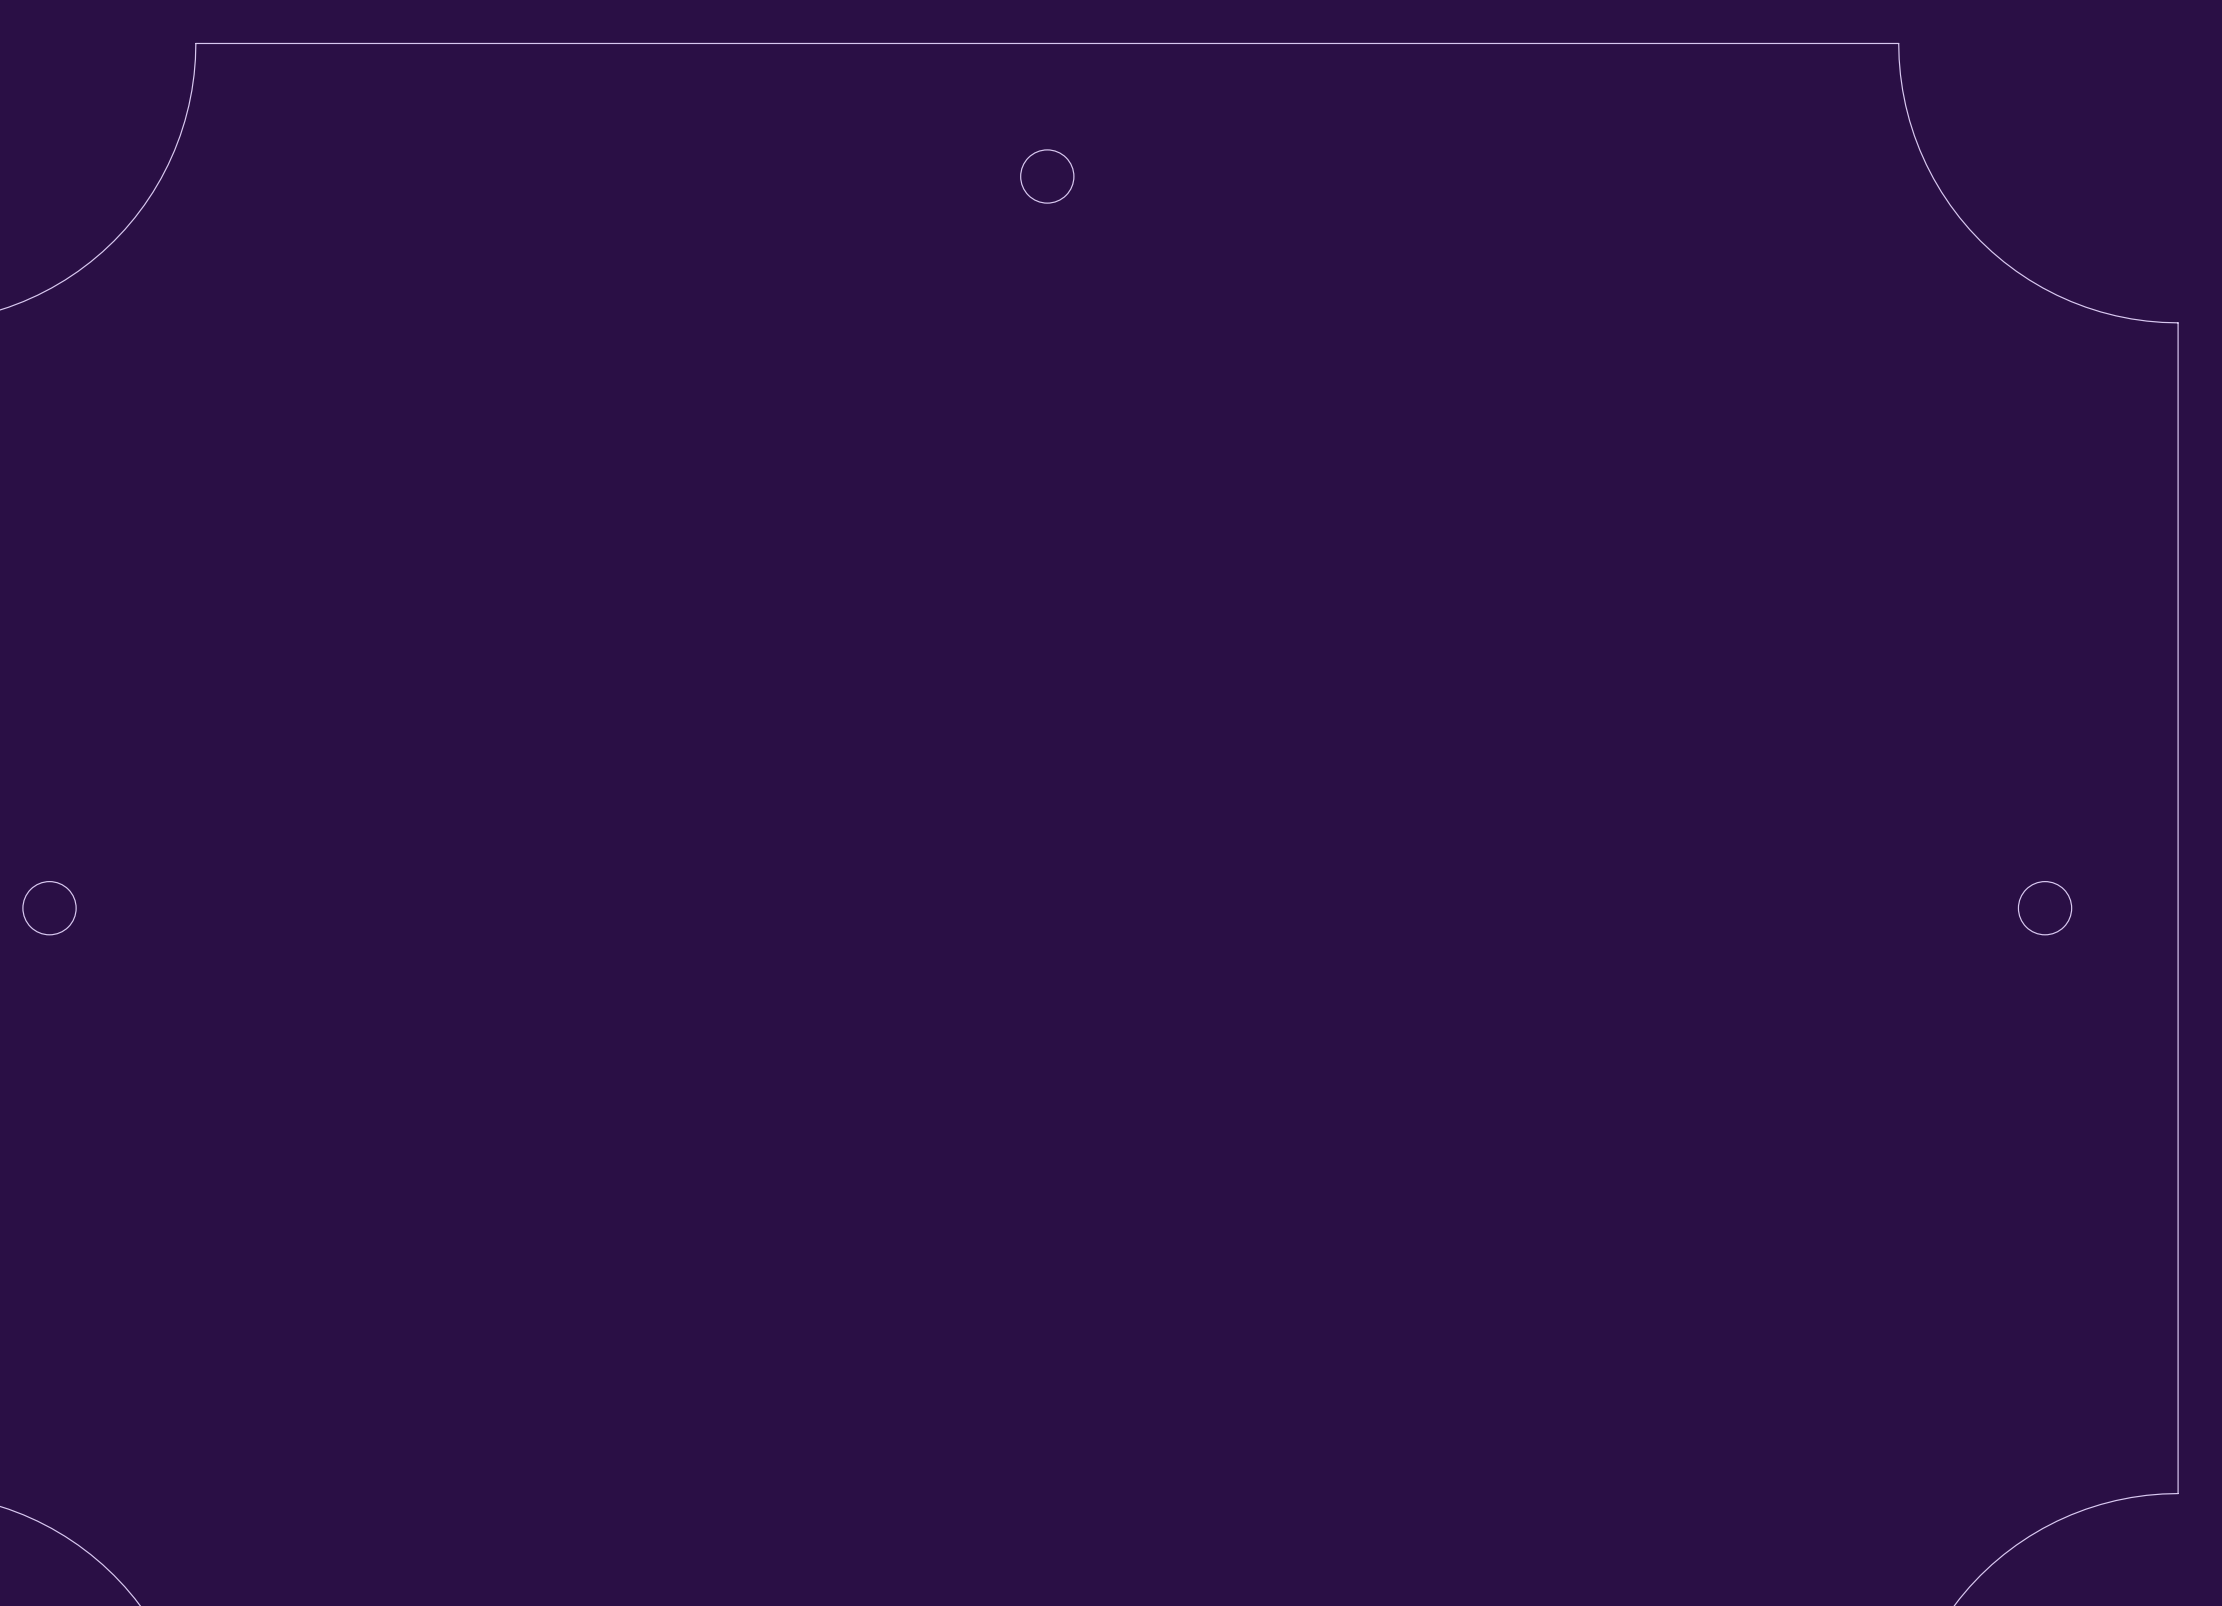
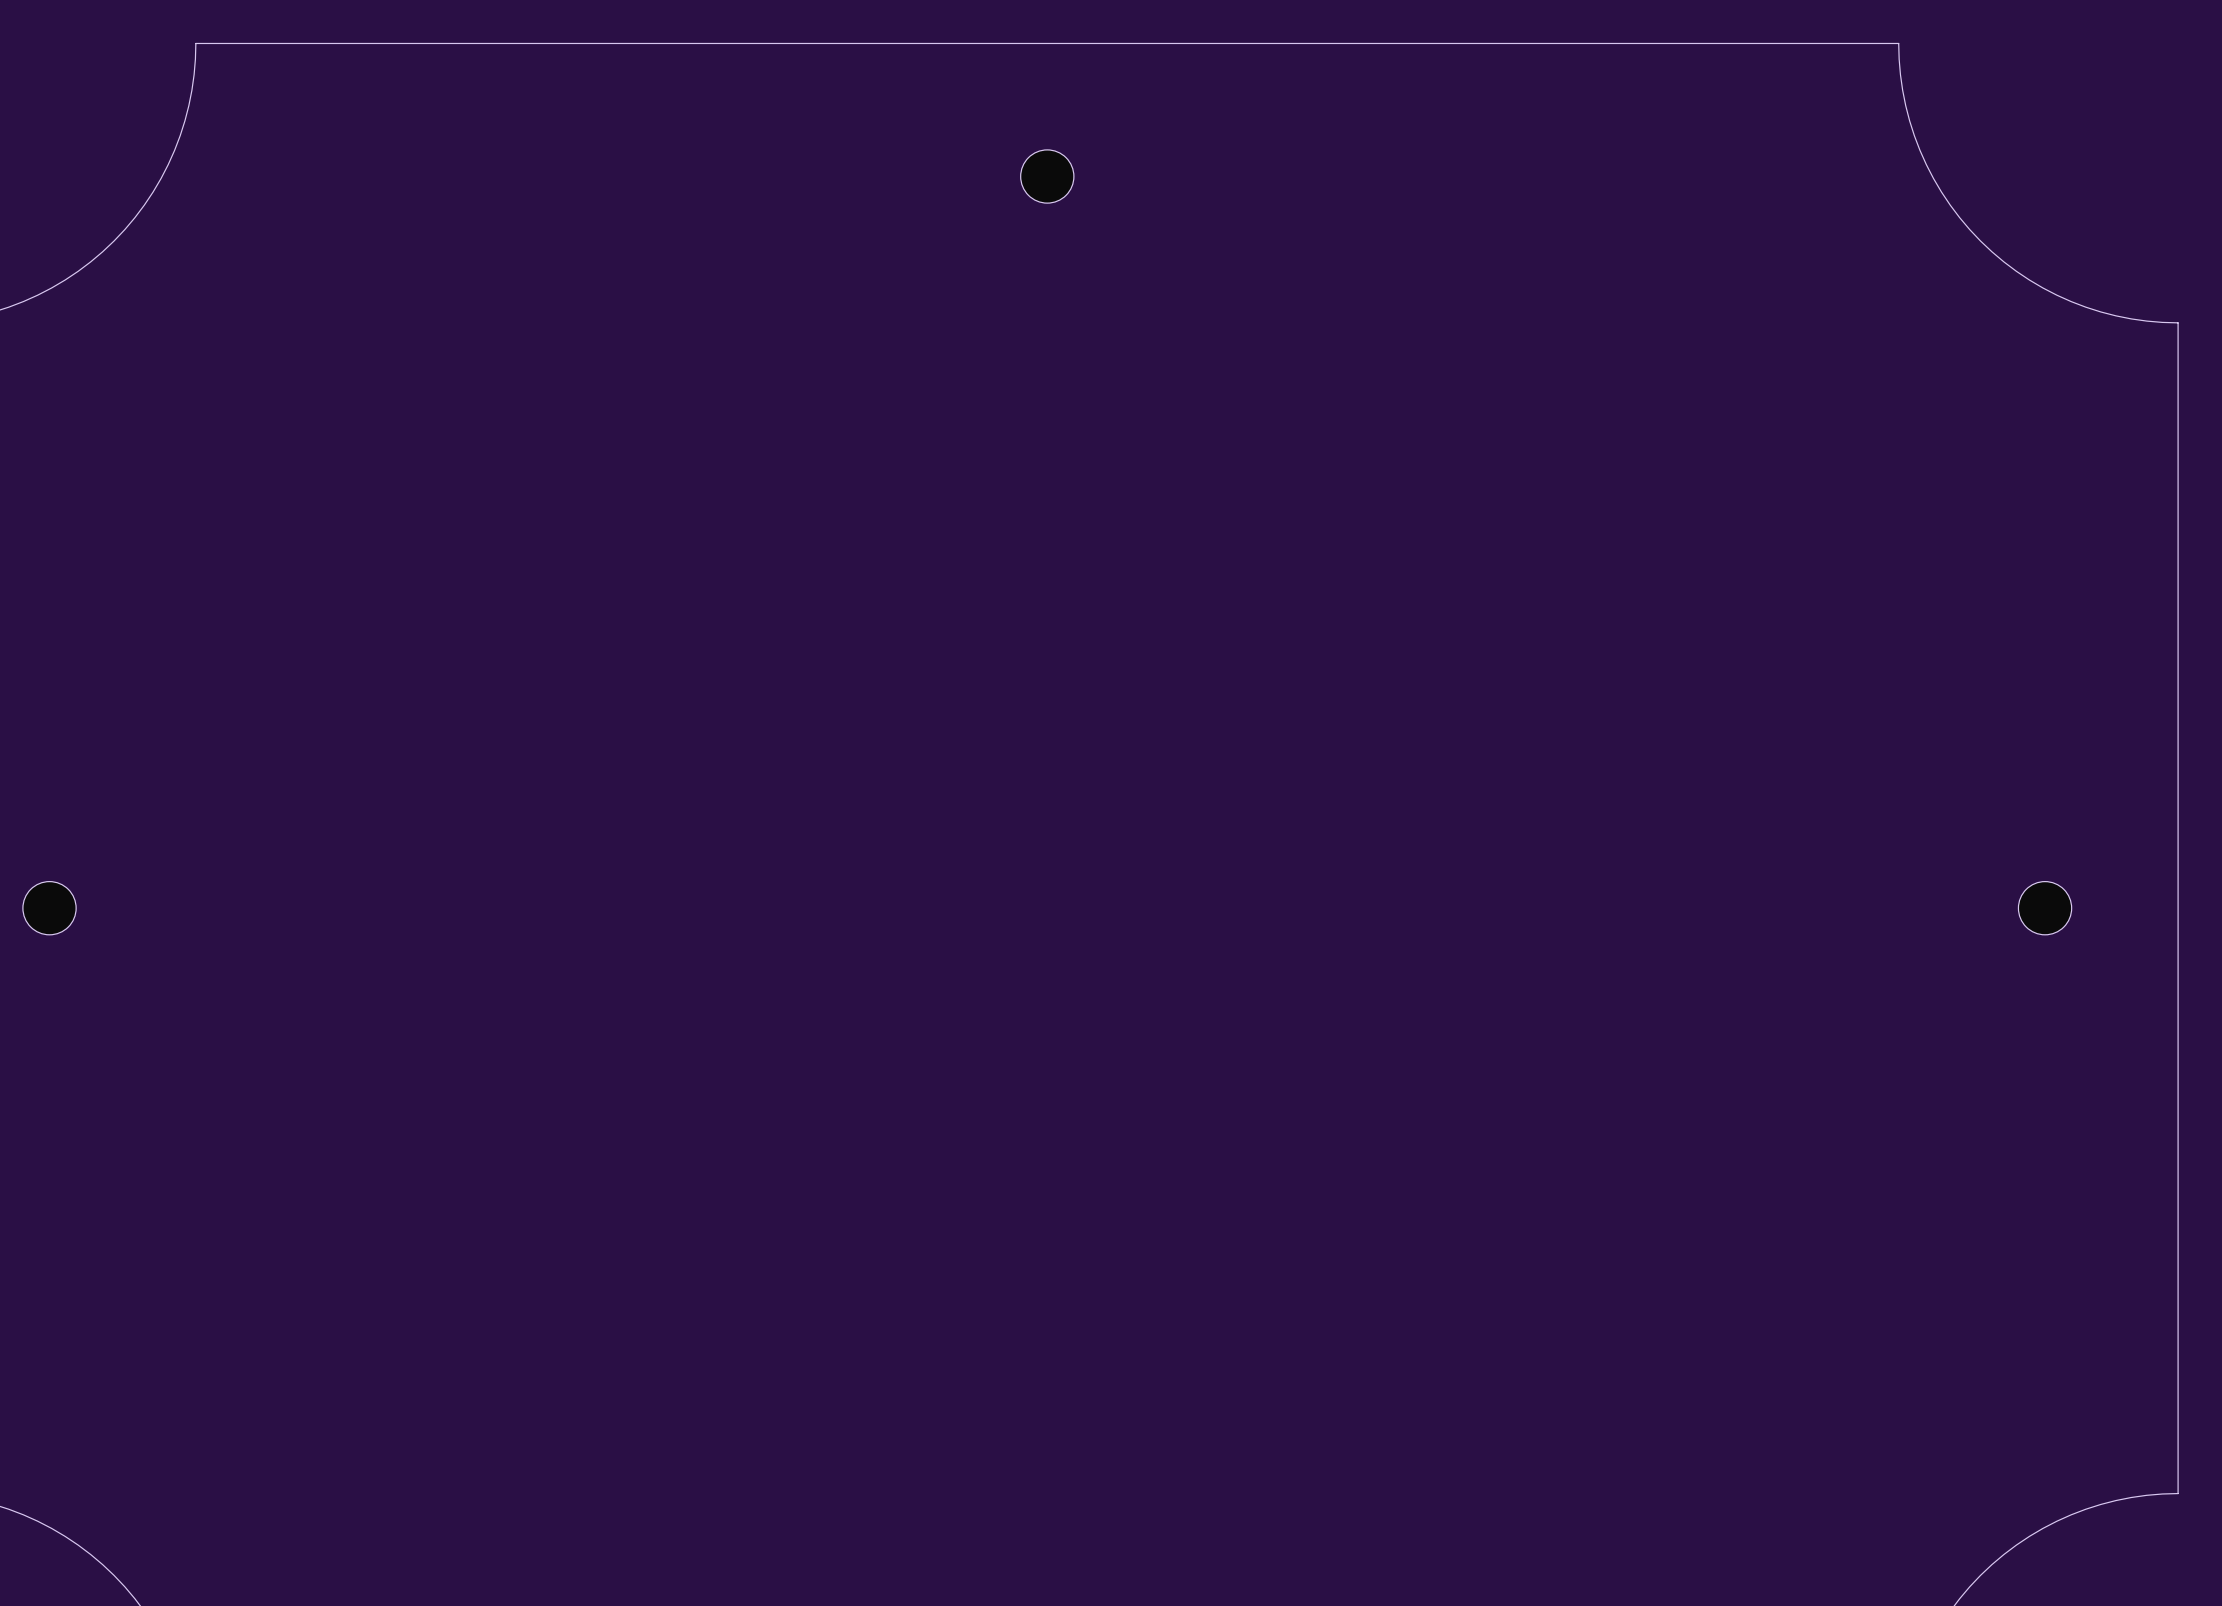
round board edge: [1020, 149, 1075, 204] -> none
part: none -> (1047, 176)
round board edge: [22, 881, 77, 936] -> none
round board edge: [2018, 881, 2072, 936] -> none
part: none -> (49, 908)
part: none -> (2045, 908)

